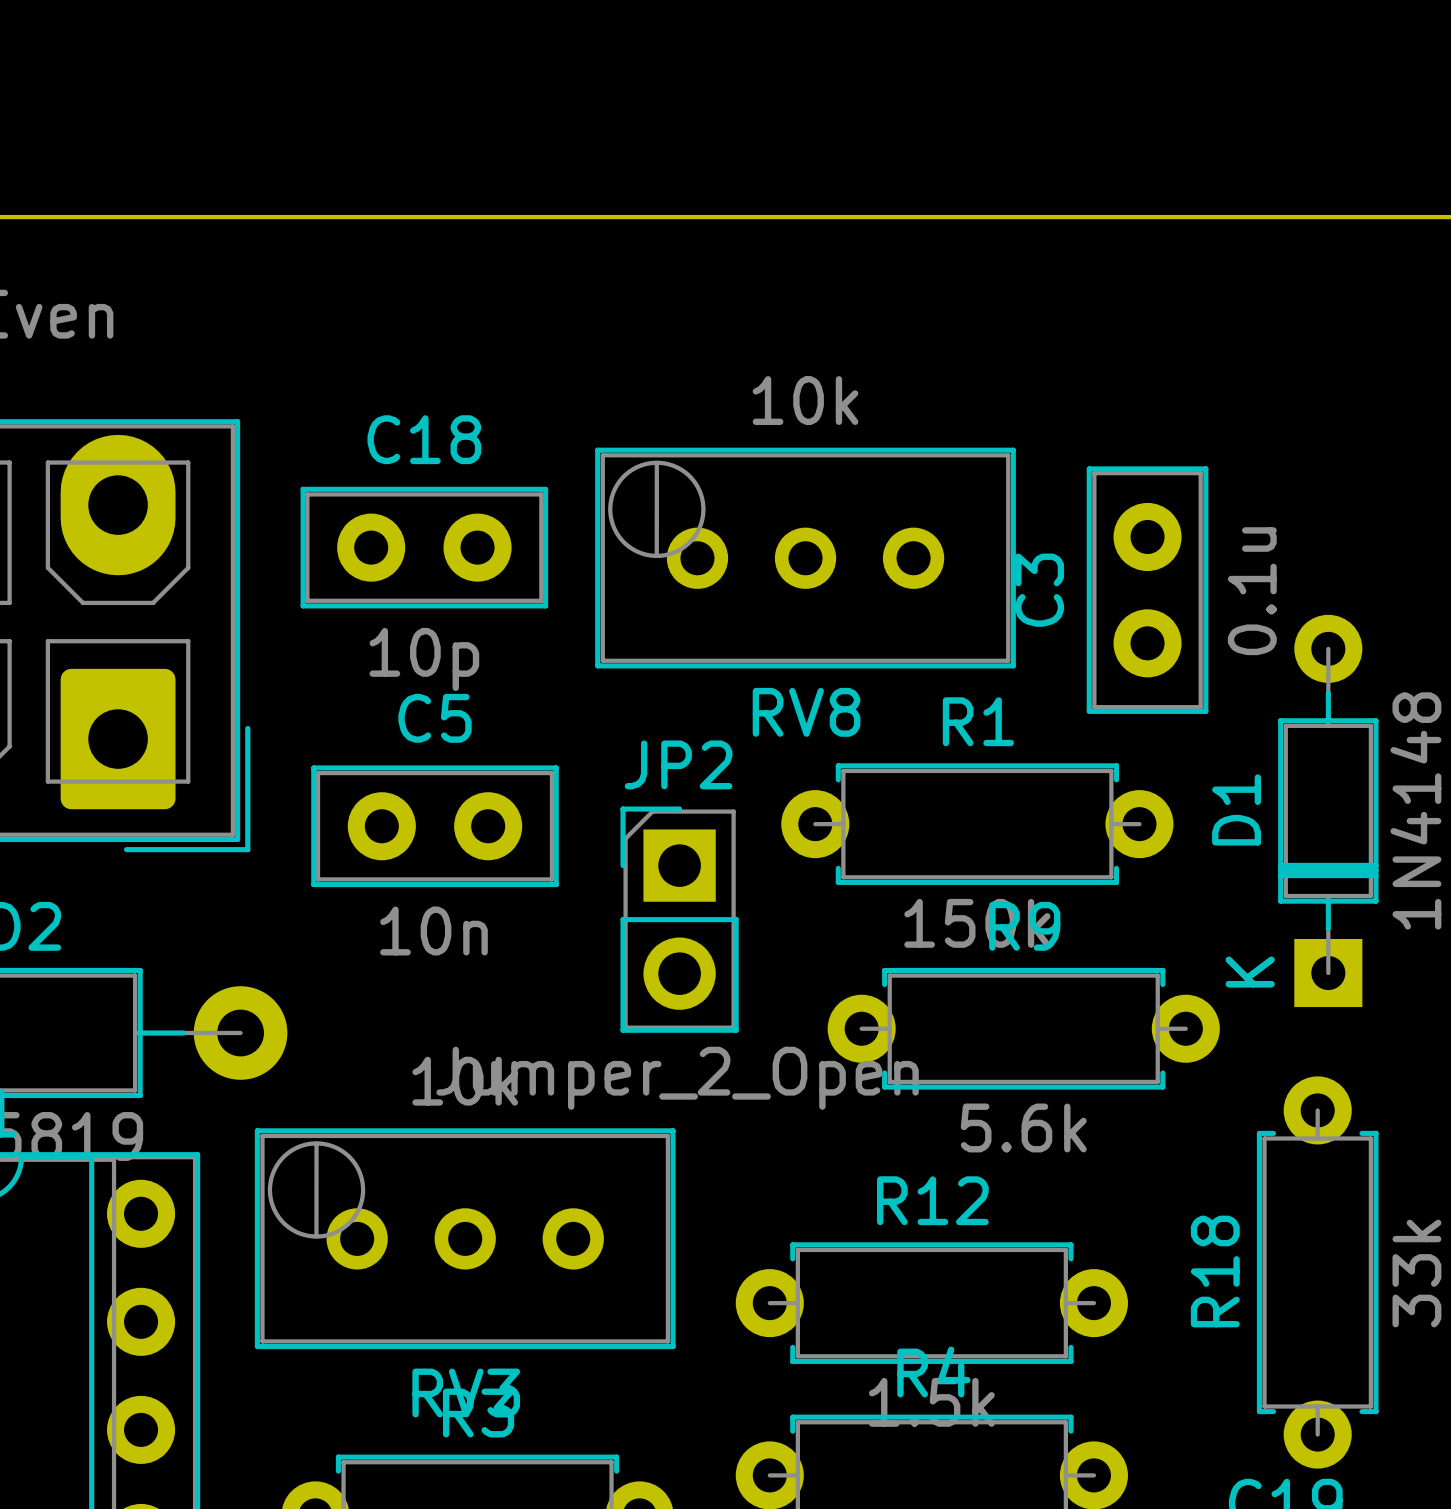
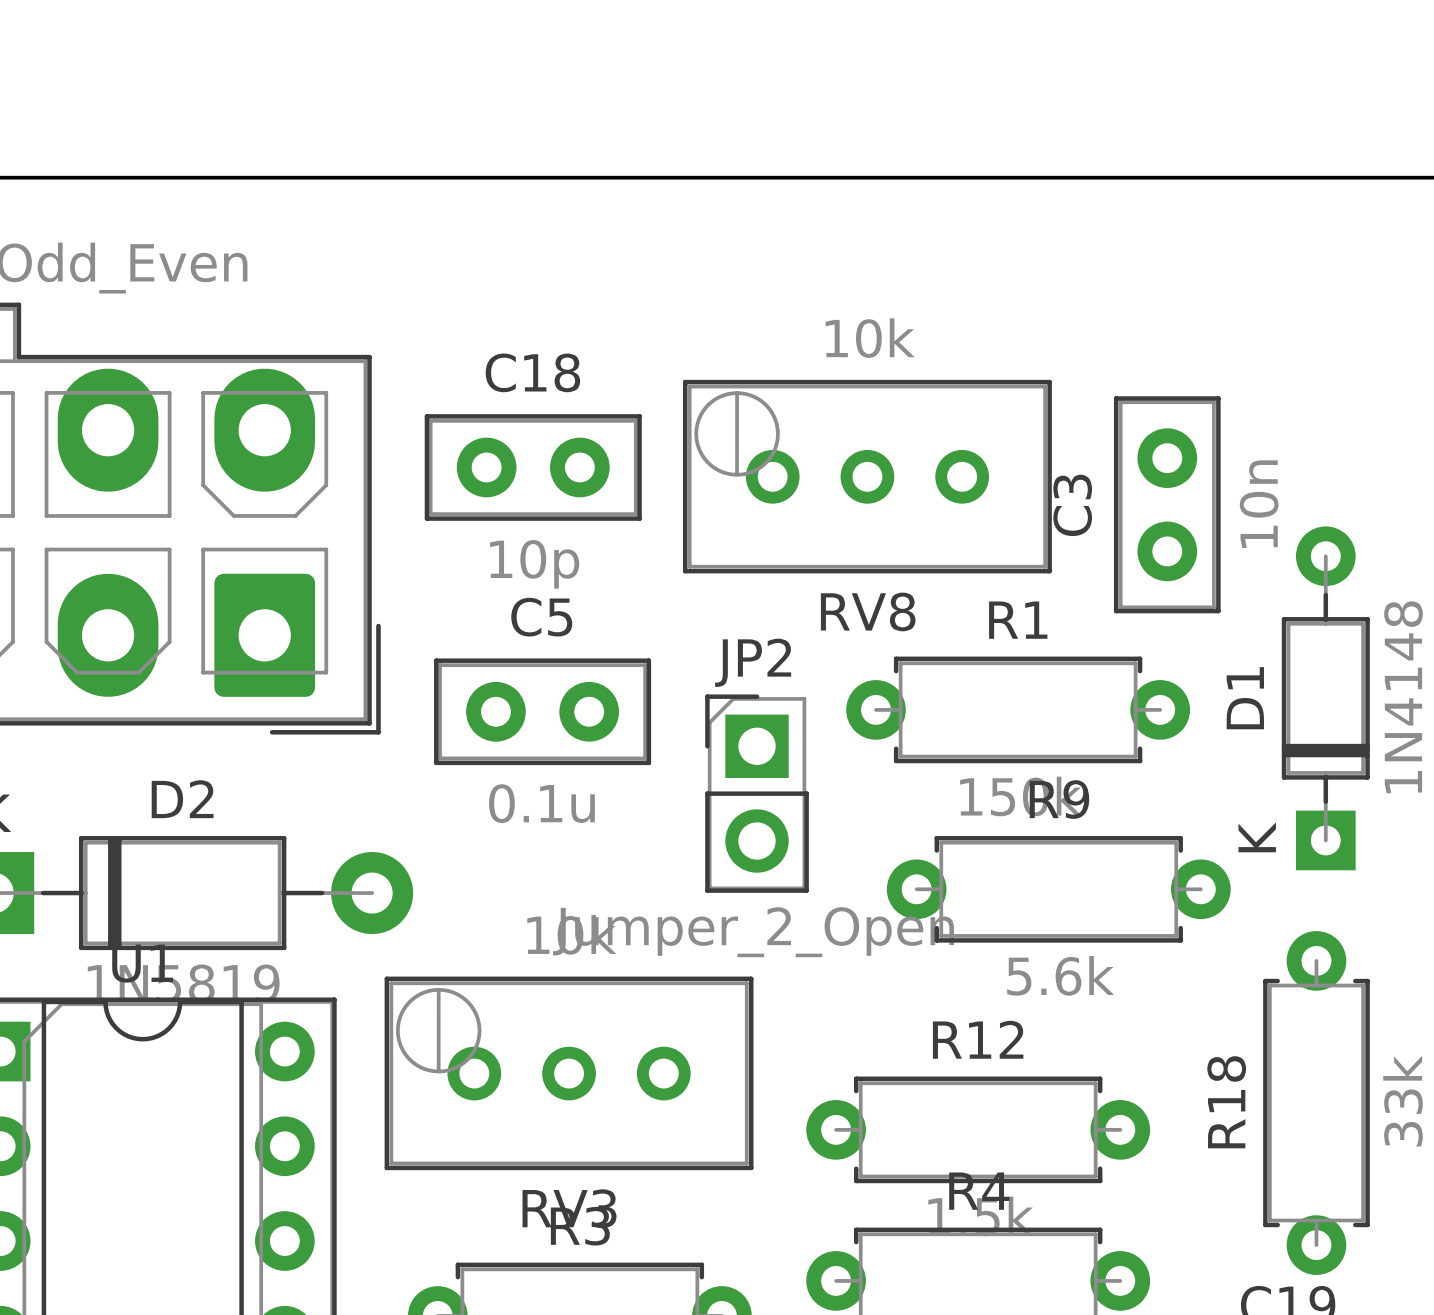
C3 value: 0.1u (1252, 591) -> 10n (1259, 504)
C5 value: 10n (433, 931) -> 0.1u (541, 803)

